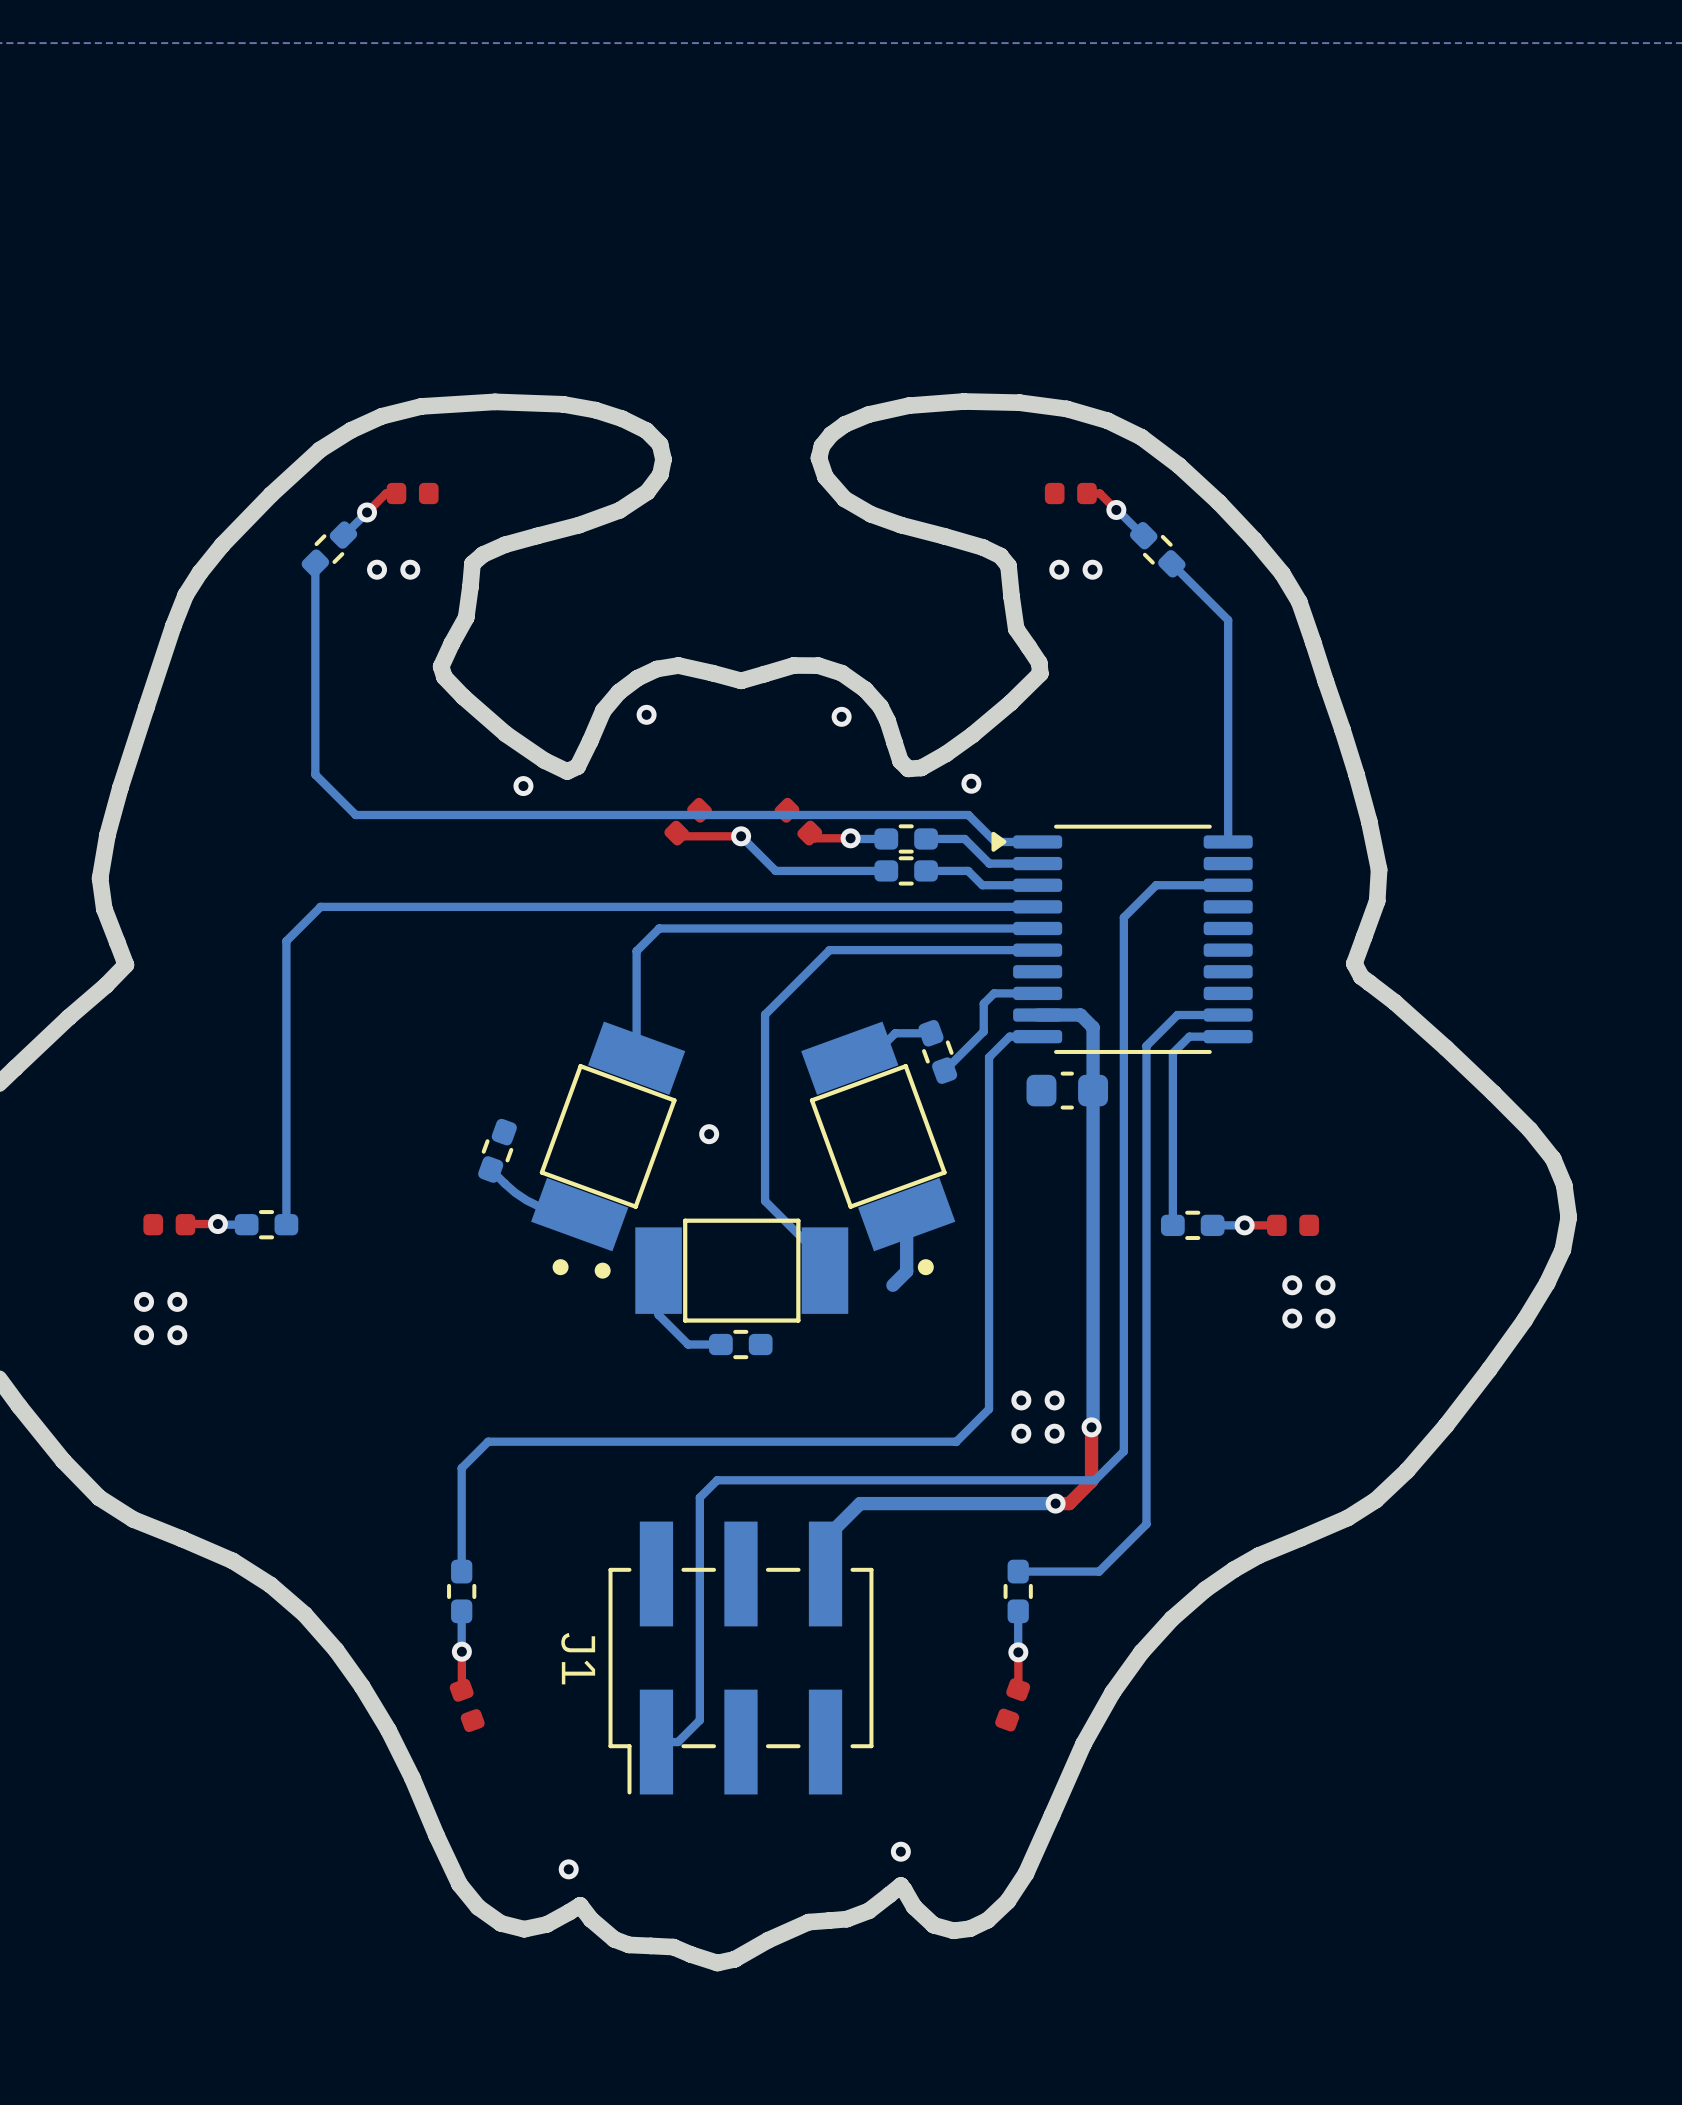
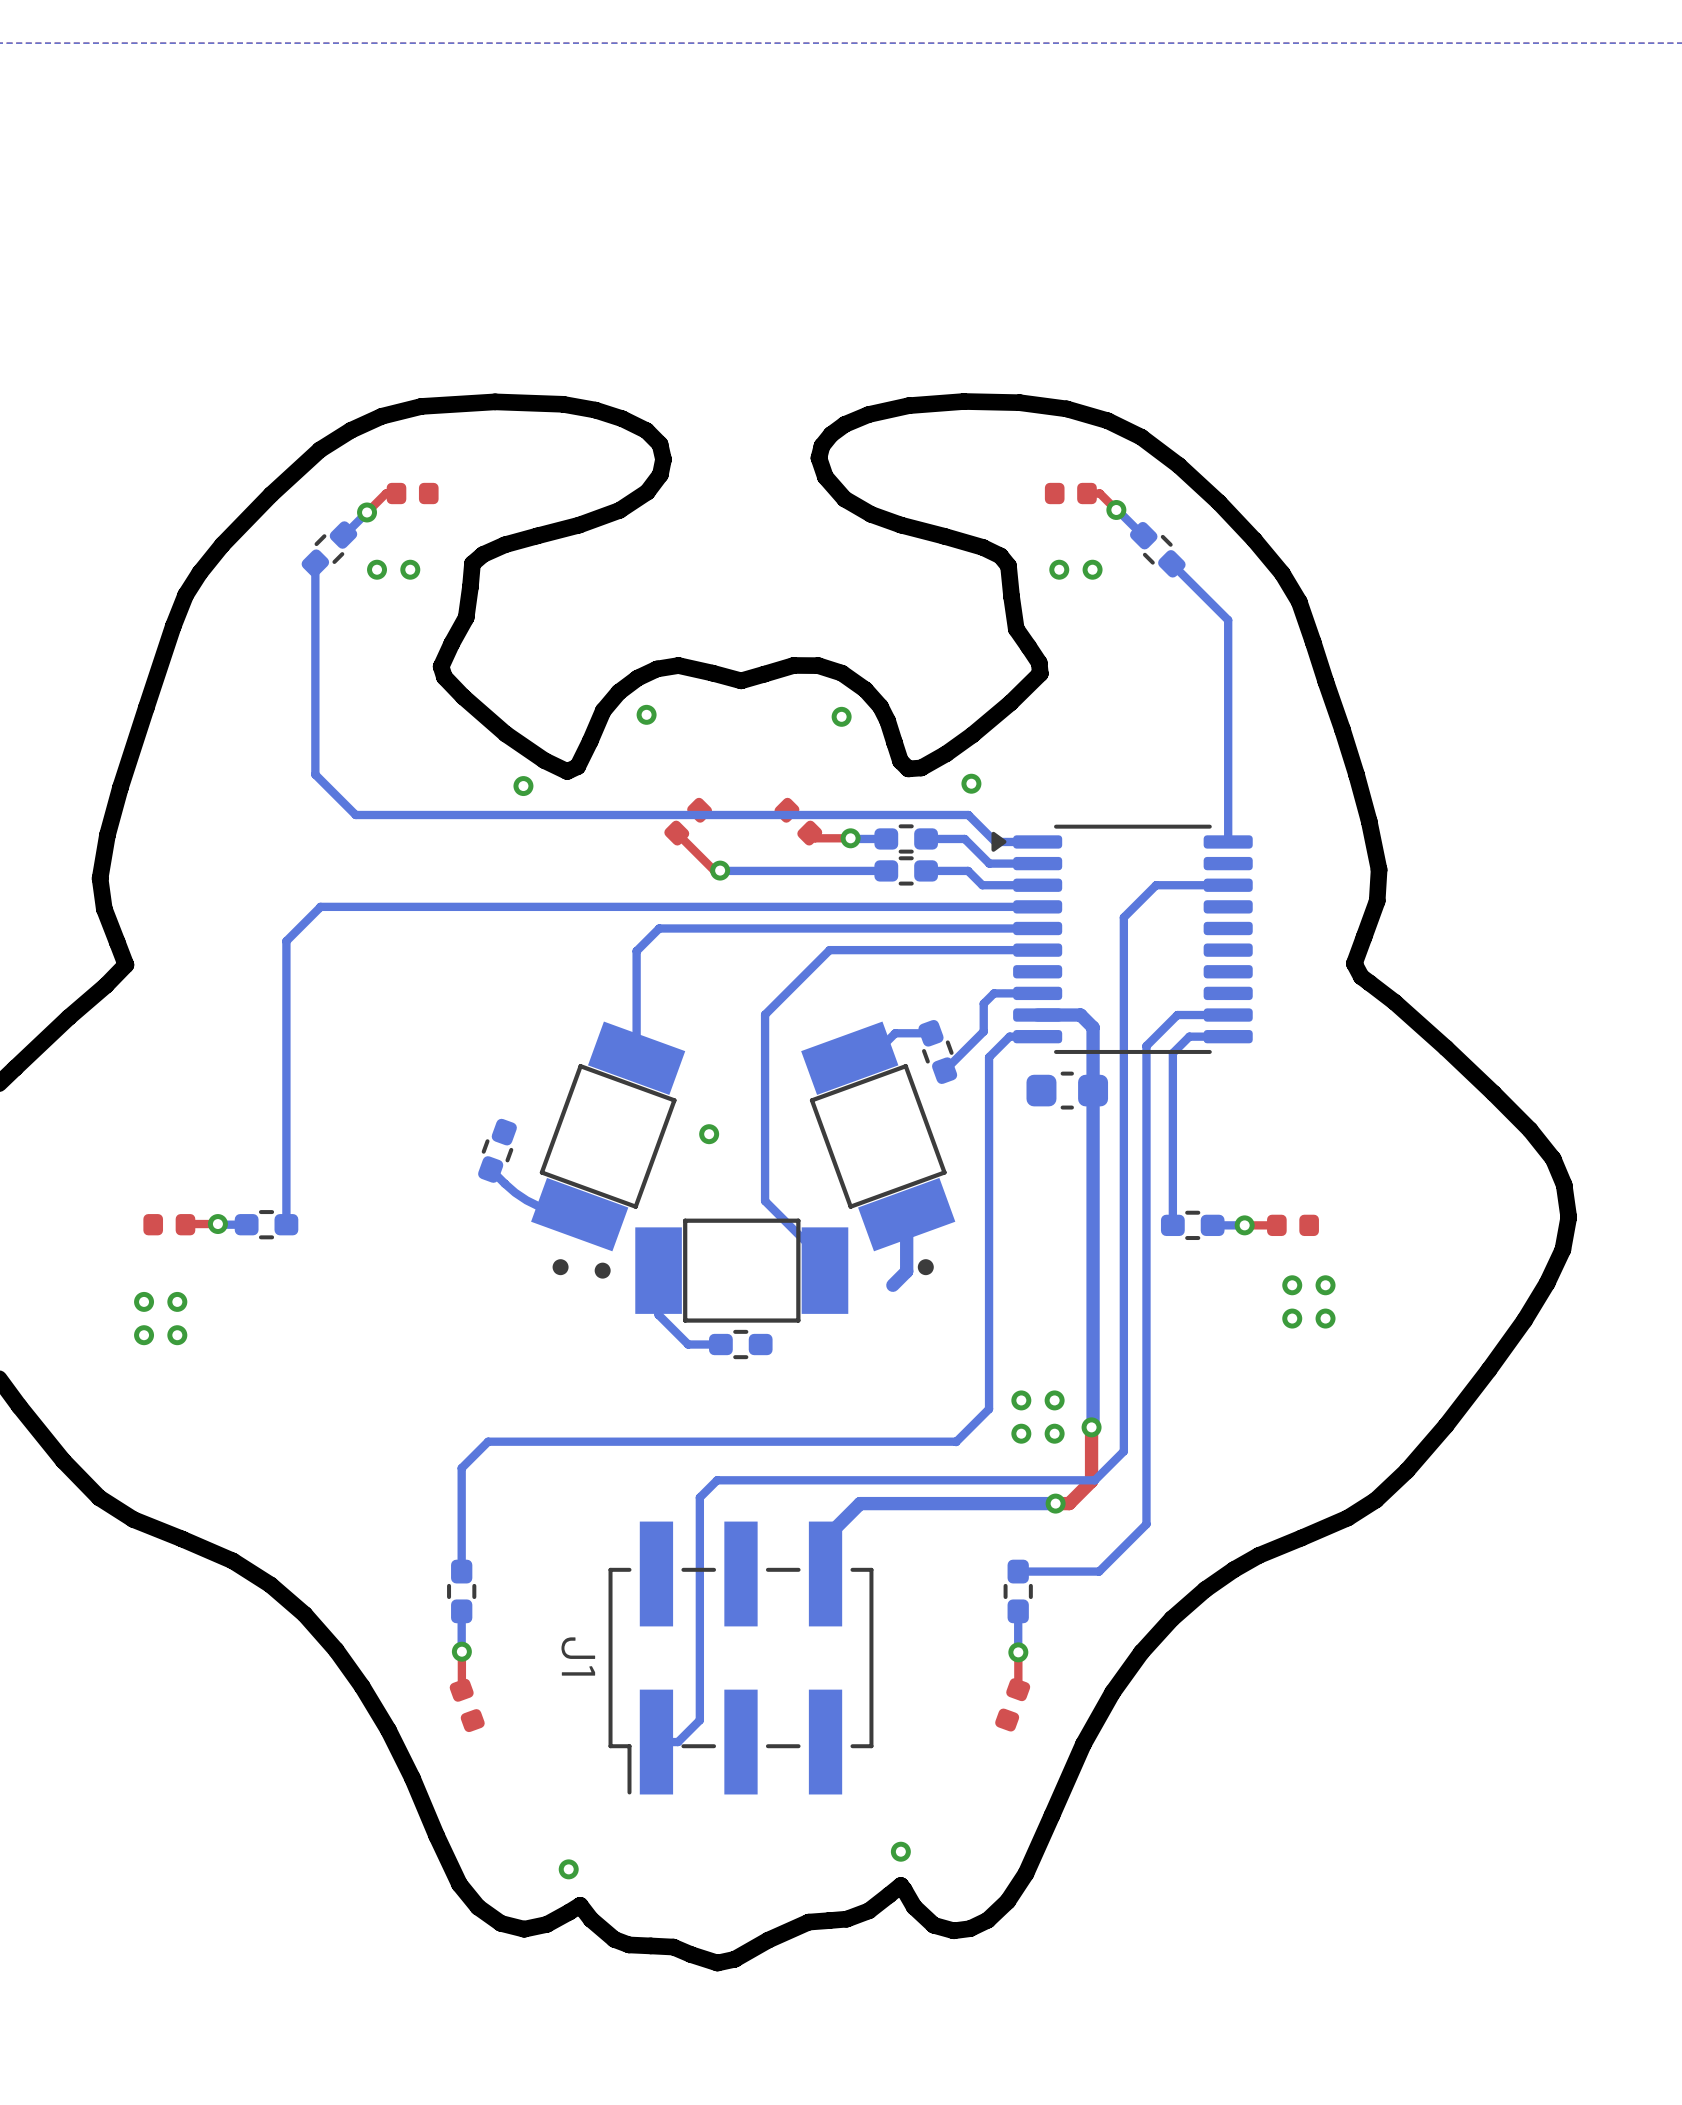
bottom track: (741, 836) (775, 870) -> (720, 870) (775, 870)
top track: (741, 836) (680, 836) -> (720, 870) (714, 870) (680, 836)
via position: (741, 836) -> (720, 870)

